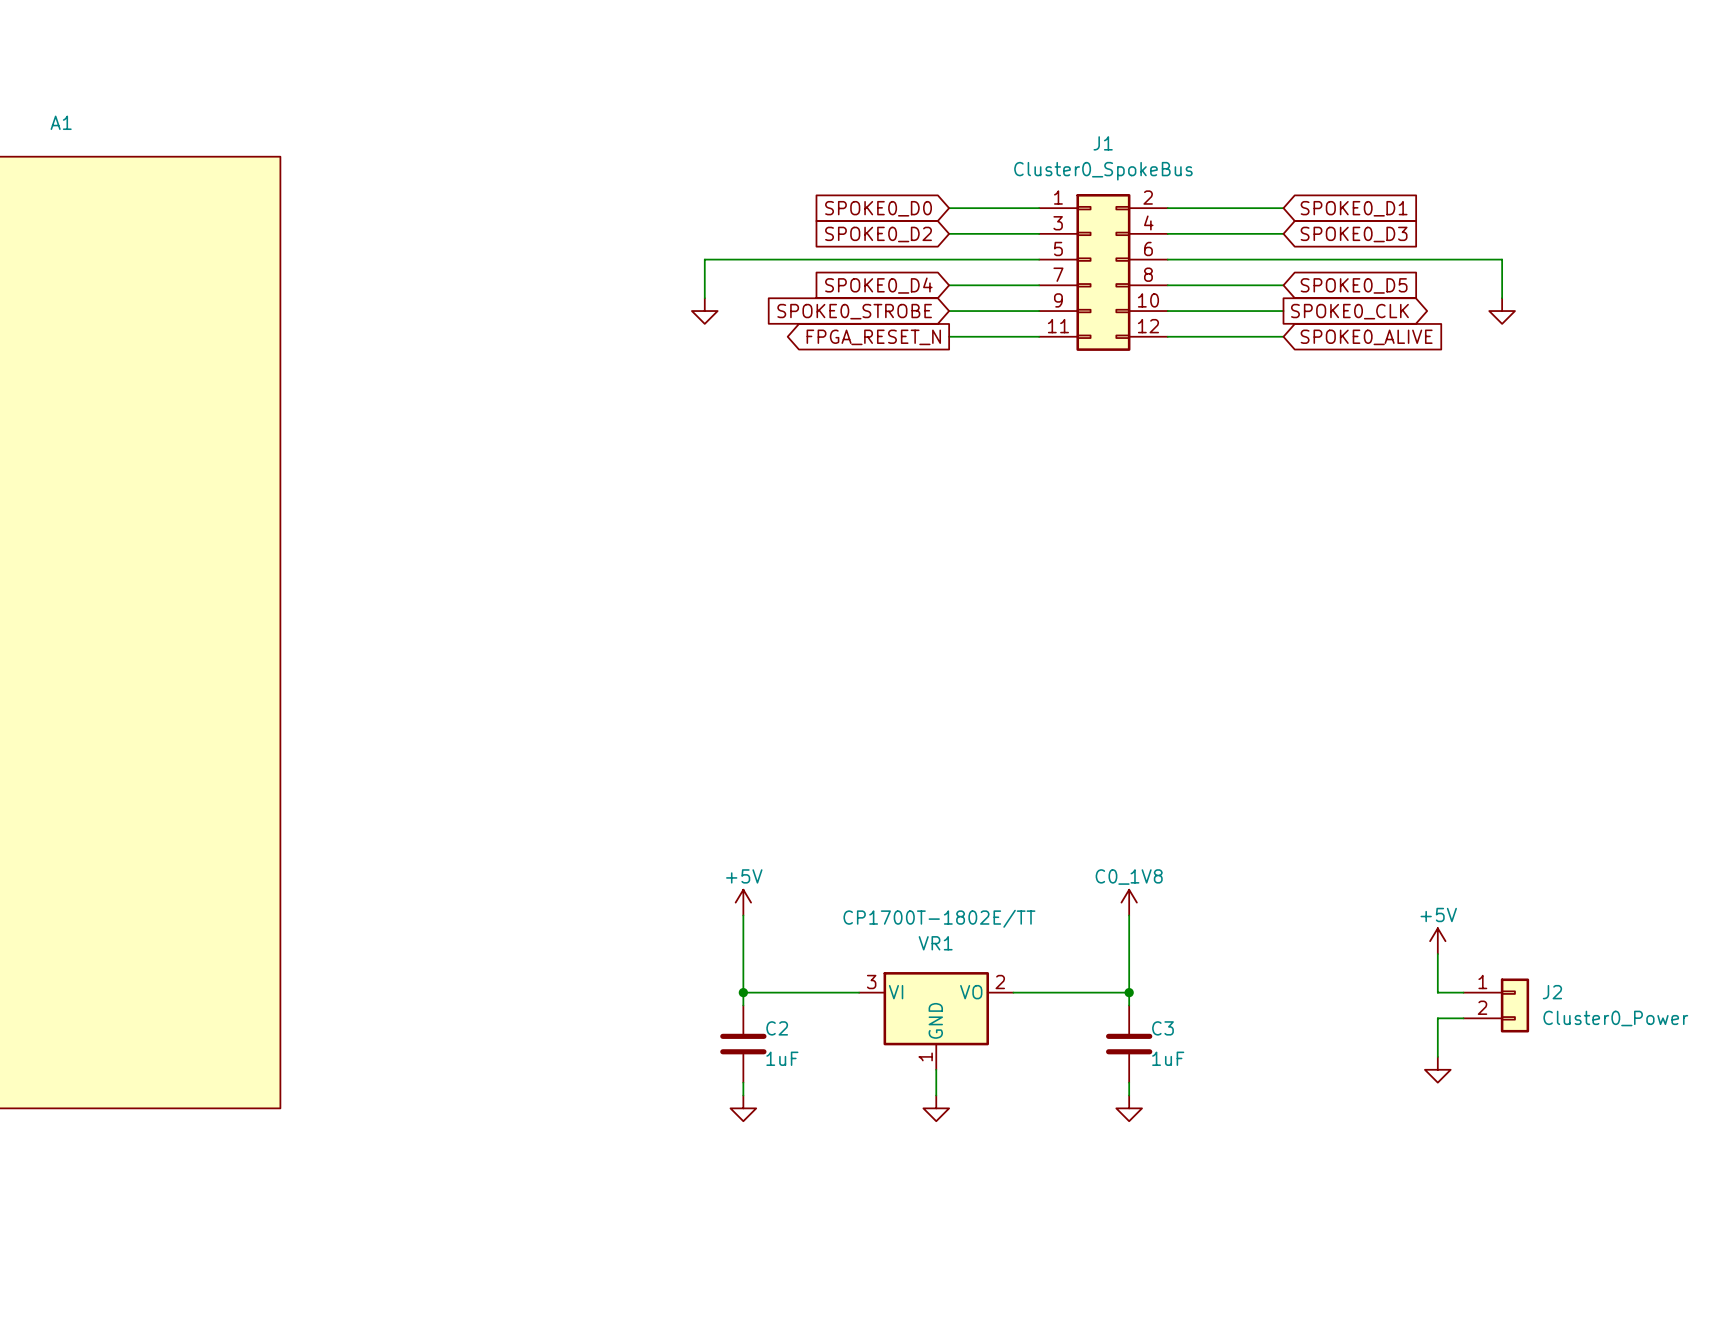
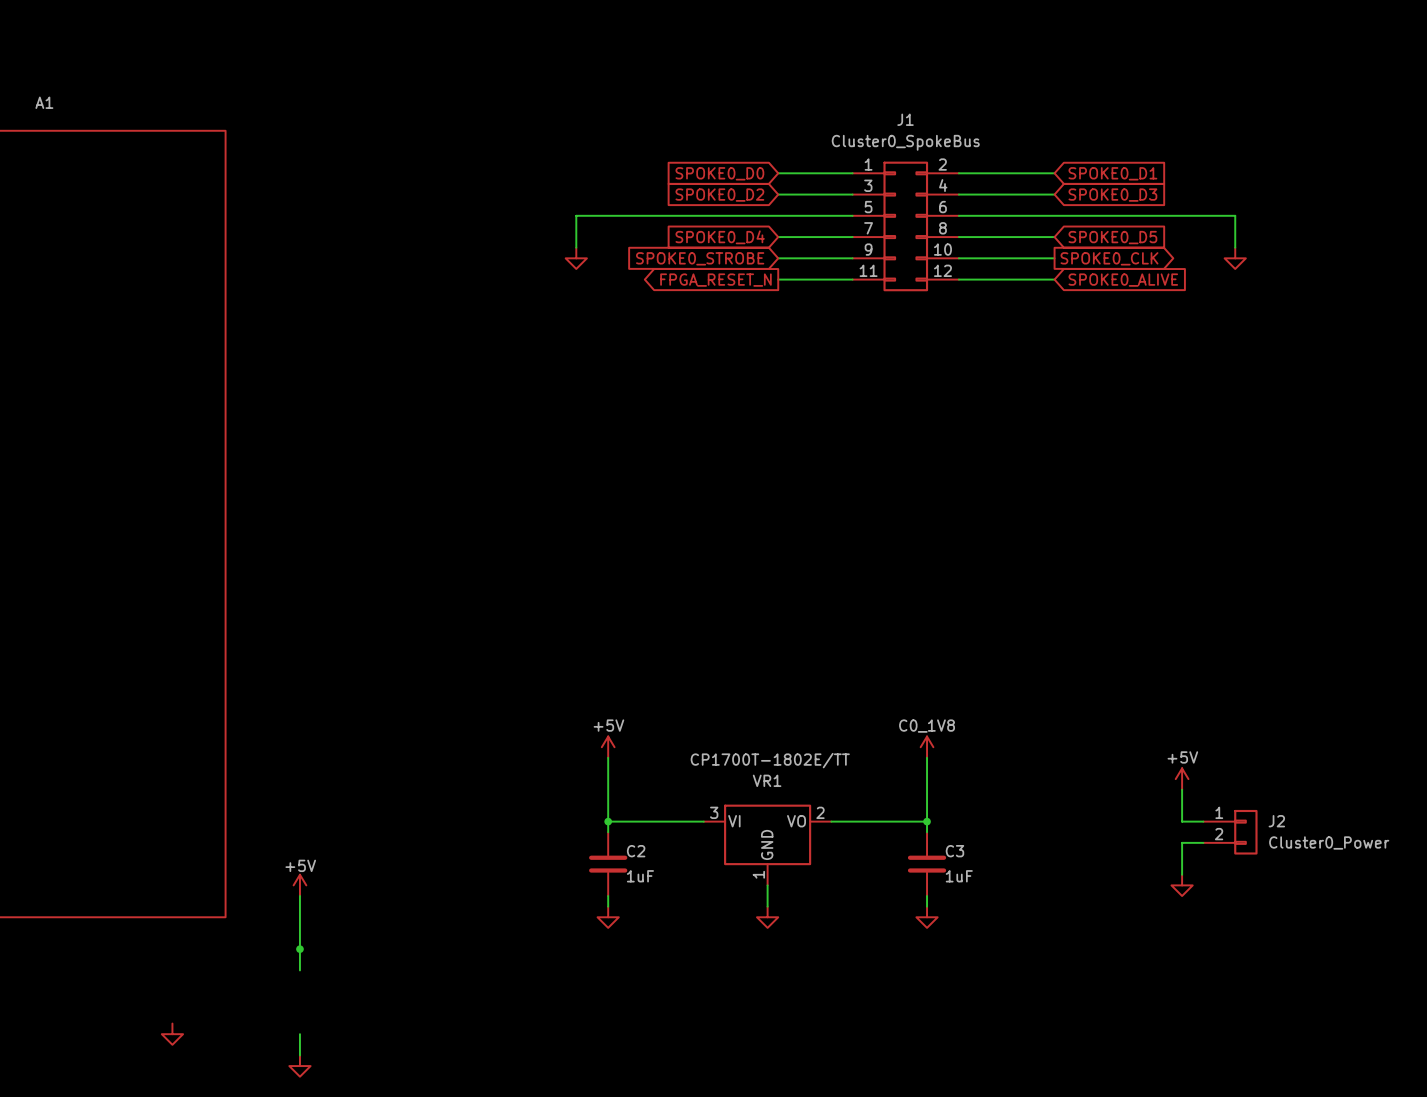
power symbol: none -> +5V (299, 885)
wire: none -> (299, 896) (299, 970)
junction: none -> (299, 949)
power symbol: none -> (172, 1034)
wire: none -> (299, 1034) (299, 1055)
power symbol: none -> (299, 1066)

